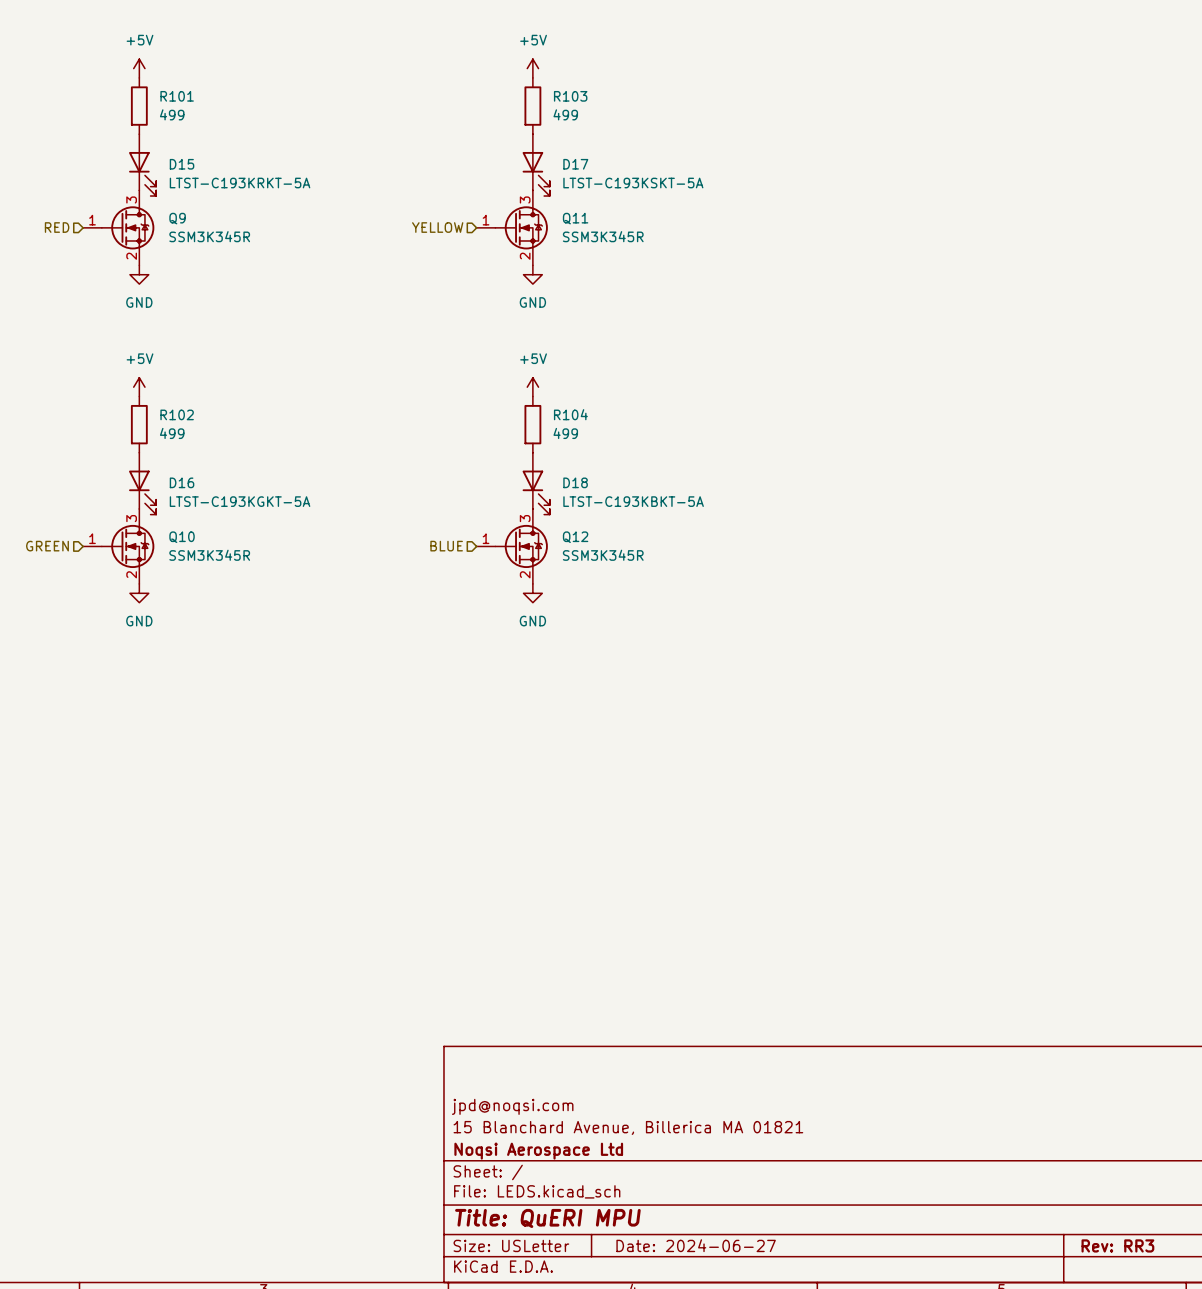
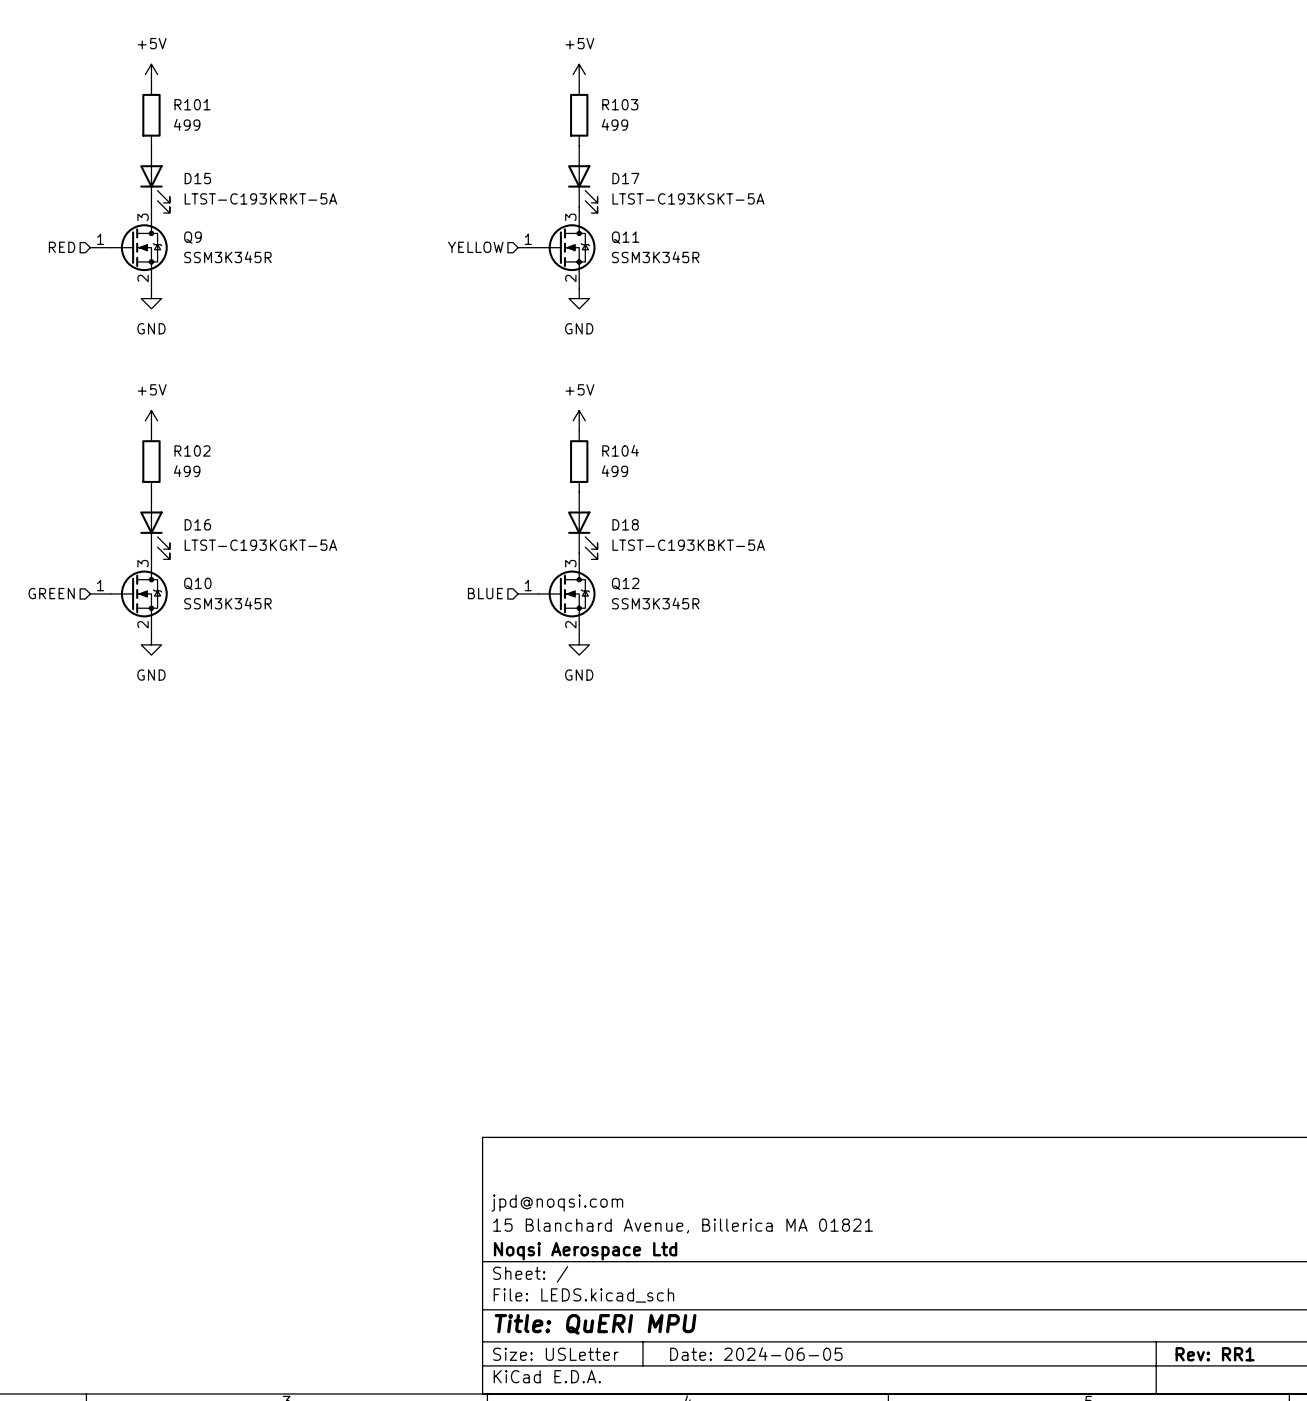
title block: Date: 2024-06-27 (696, 1245) -> Date: 2024-06-05 (756, 1353)
title block: Rev: RR3 (1117, 1245) -> Rev: RR1 (1215, 1354)

